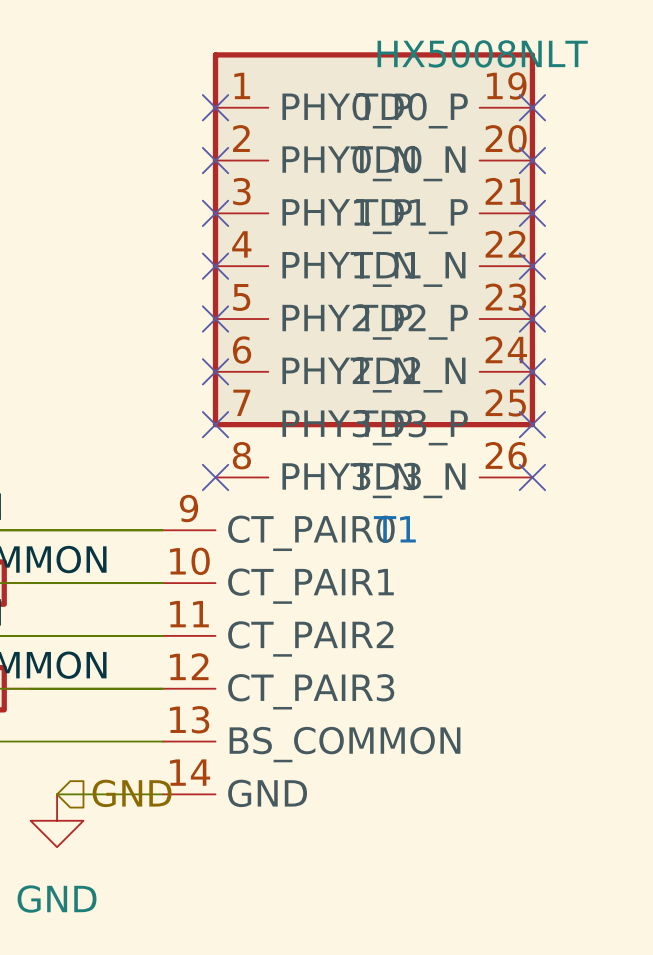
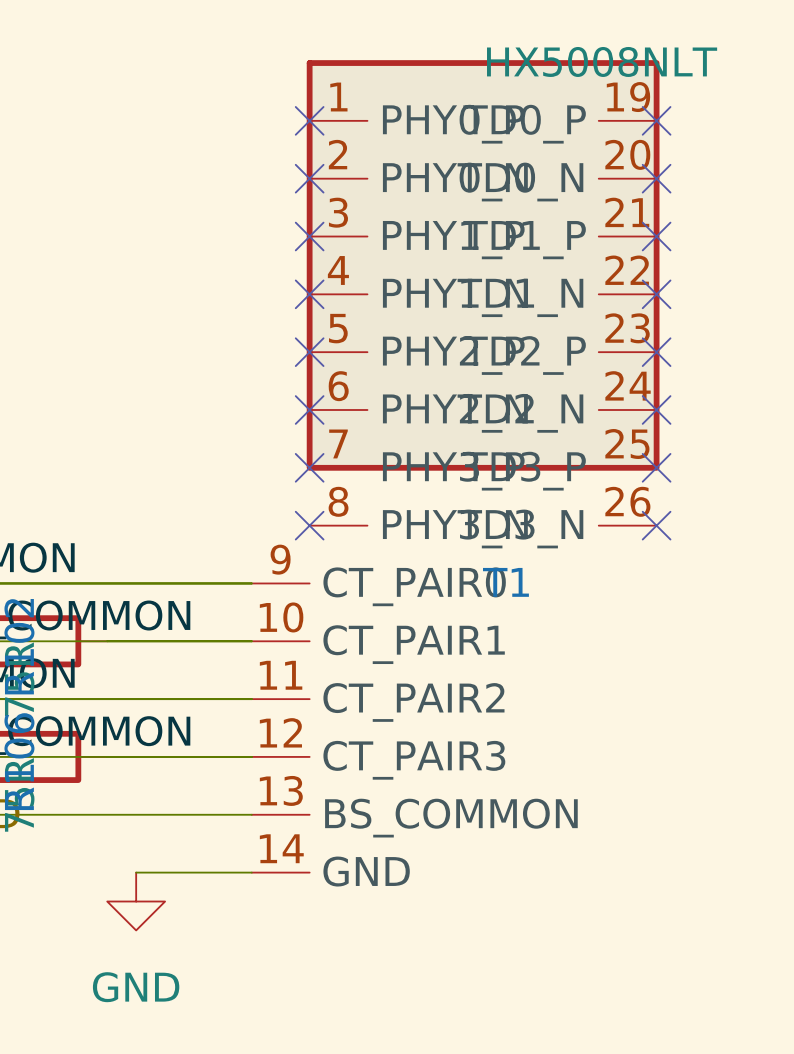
hierarchical label: GND (132, 793) -> none

